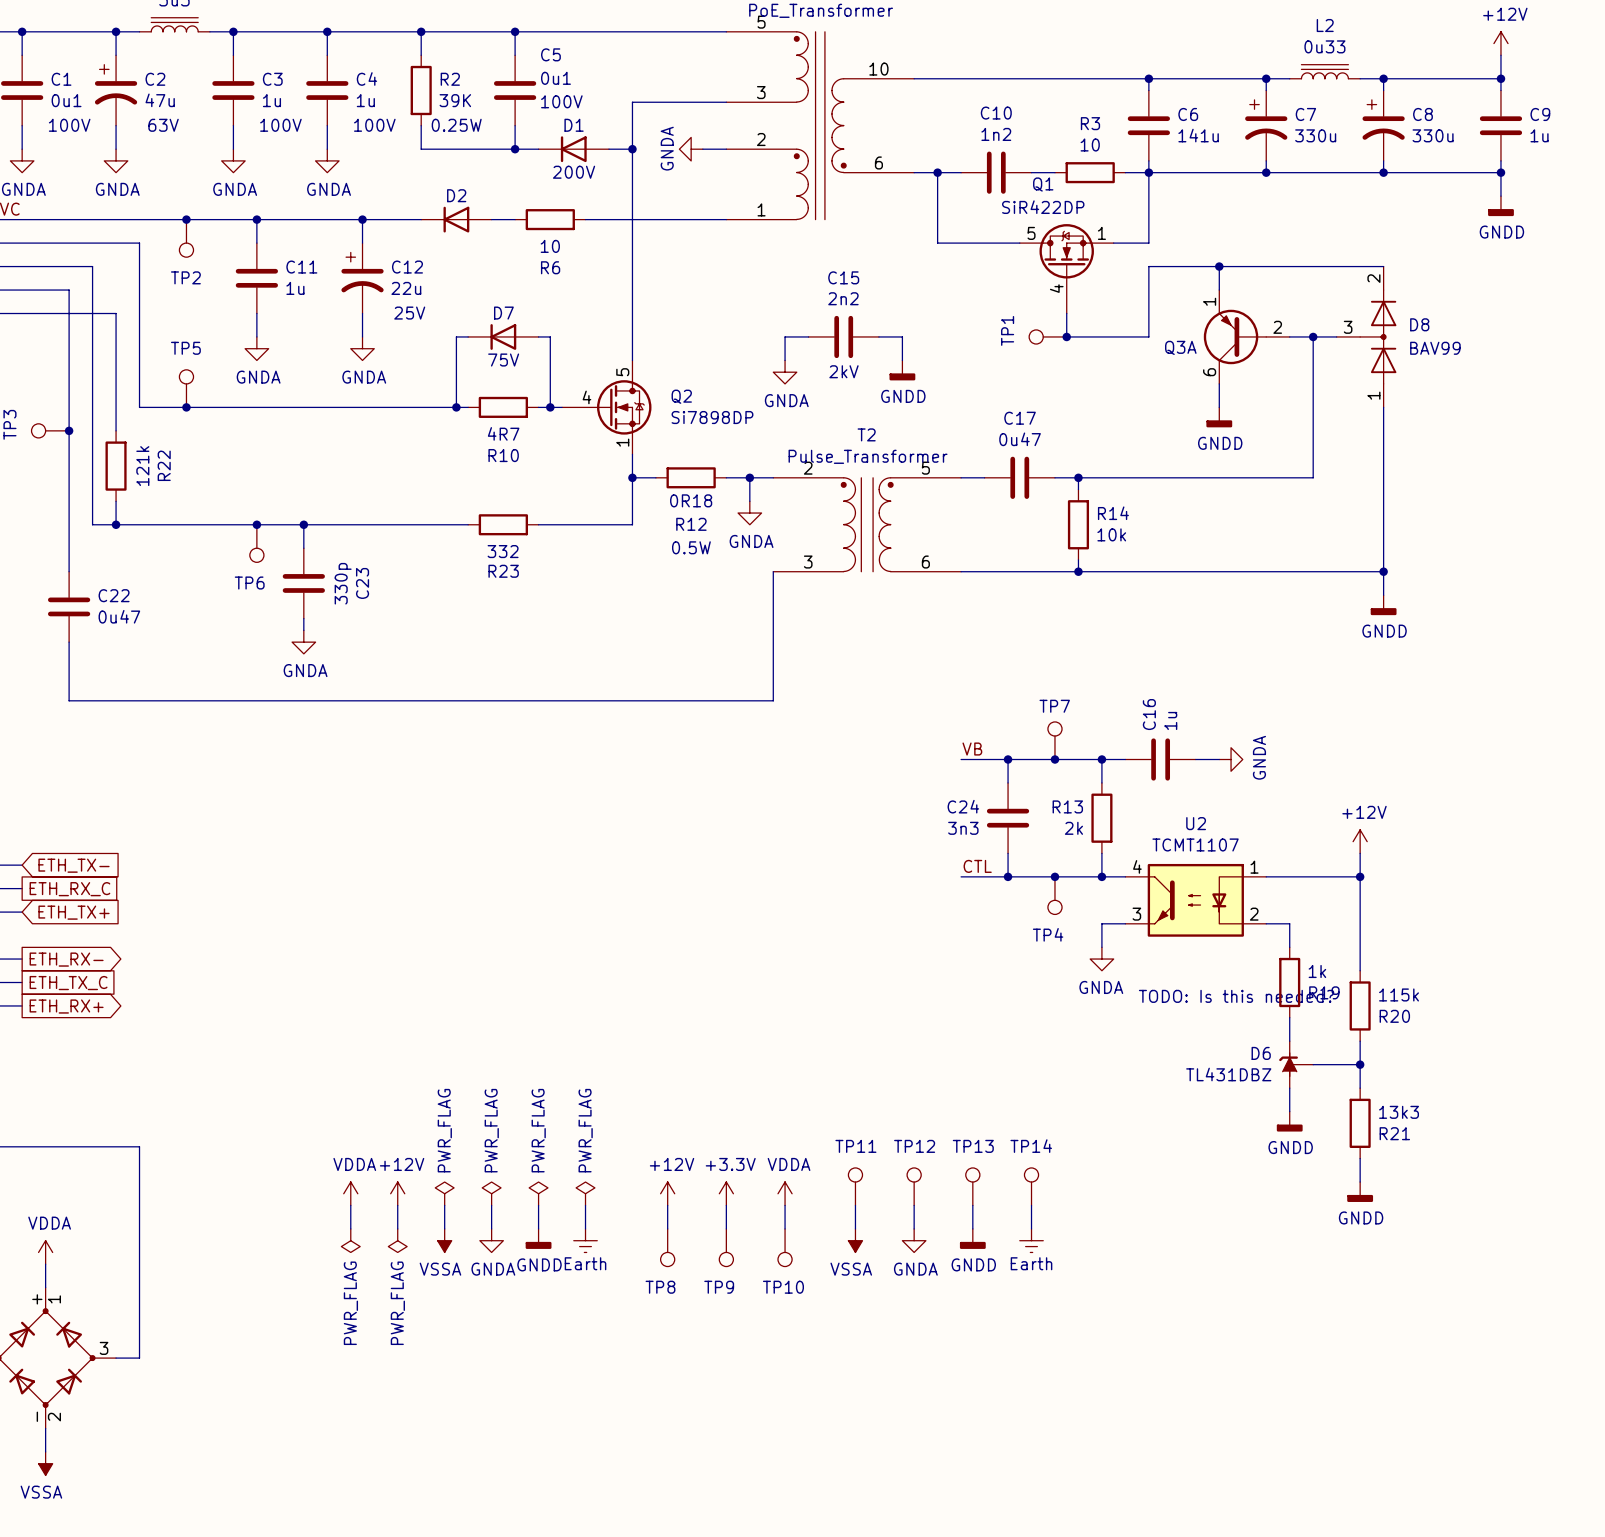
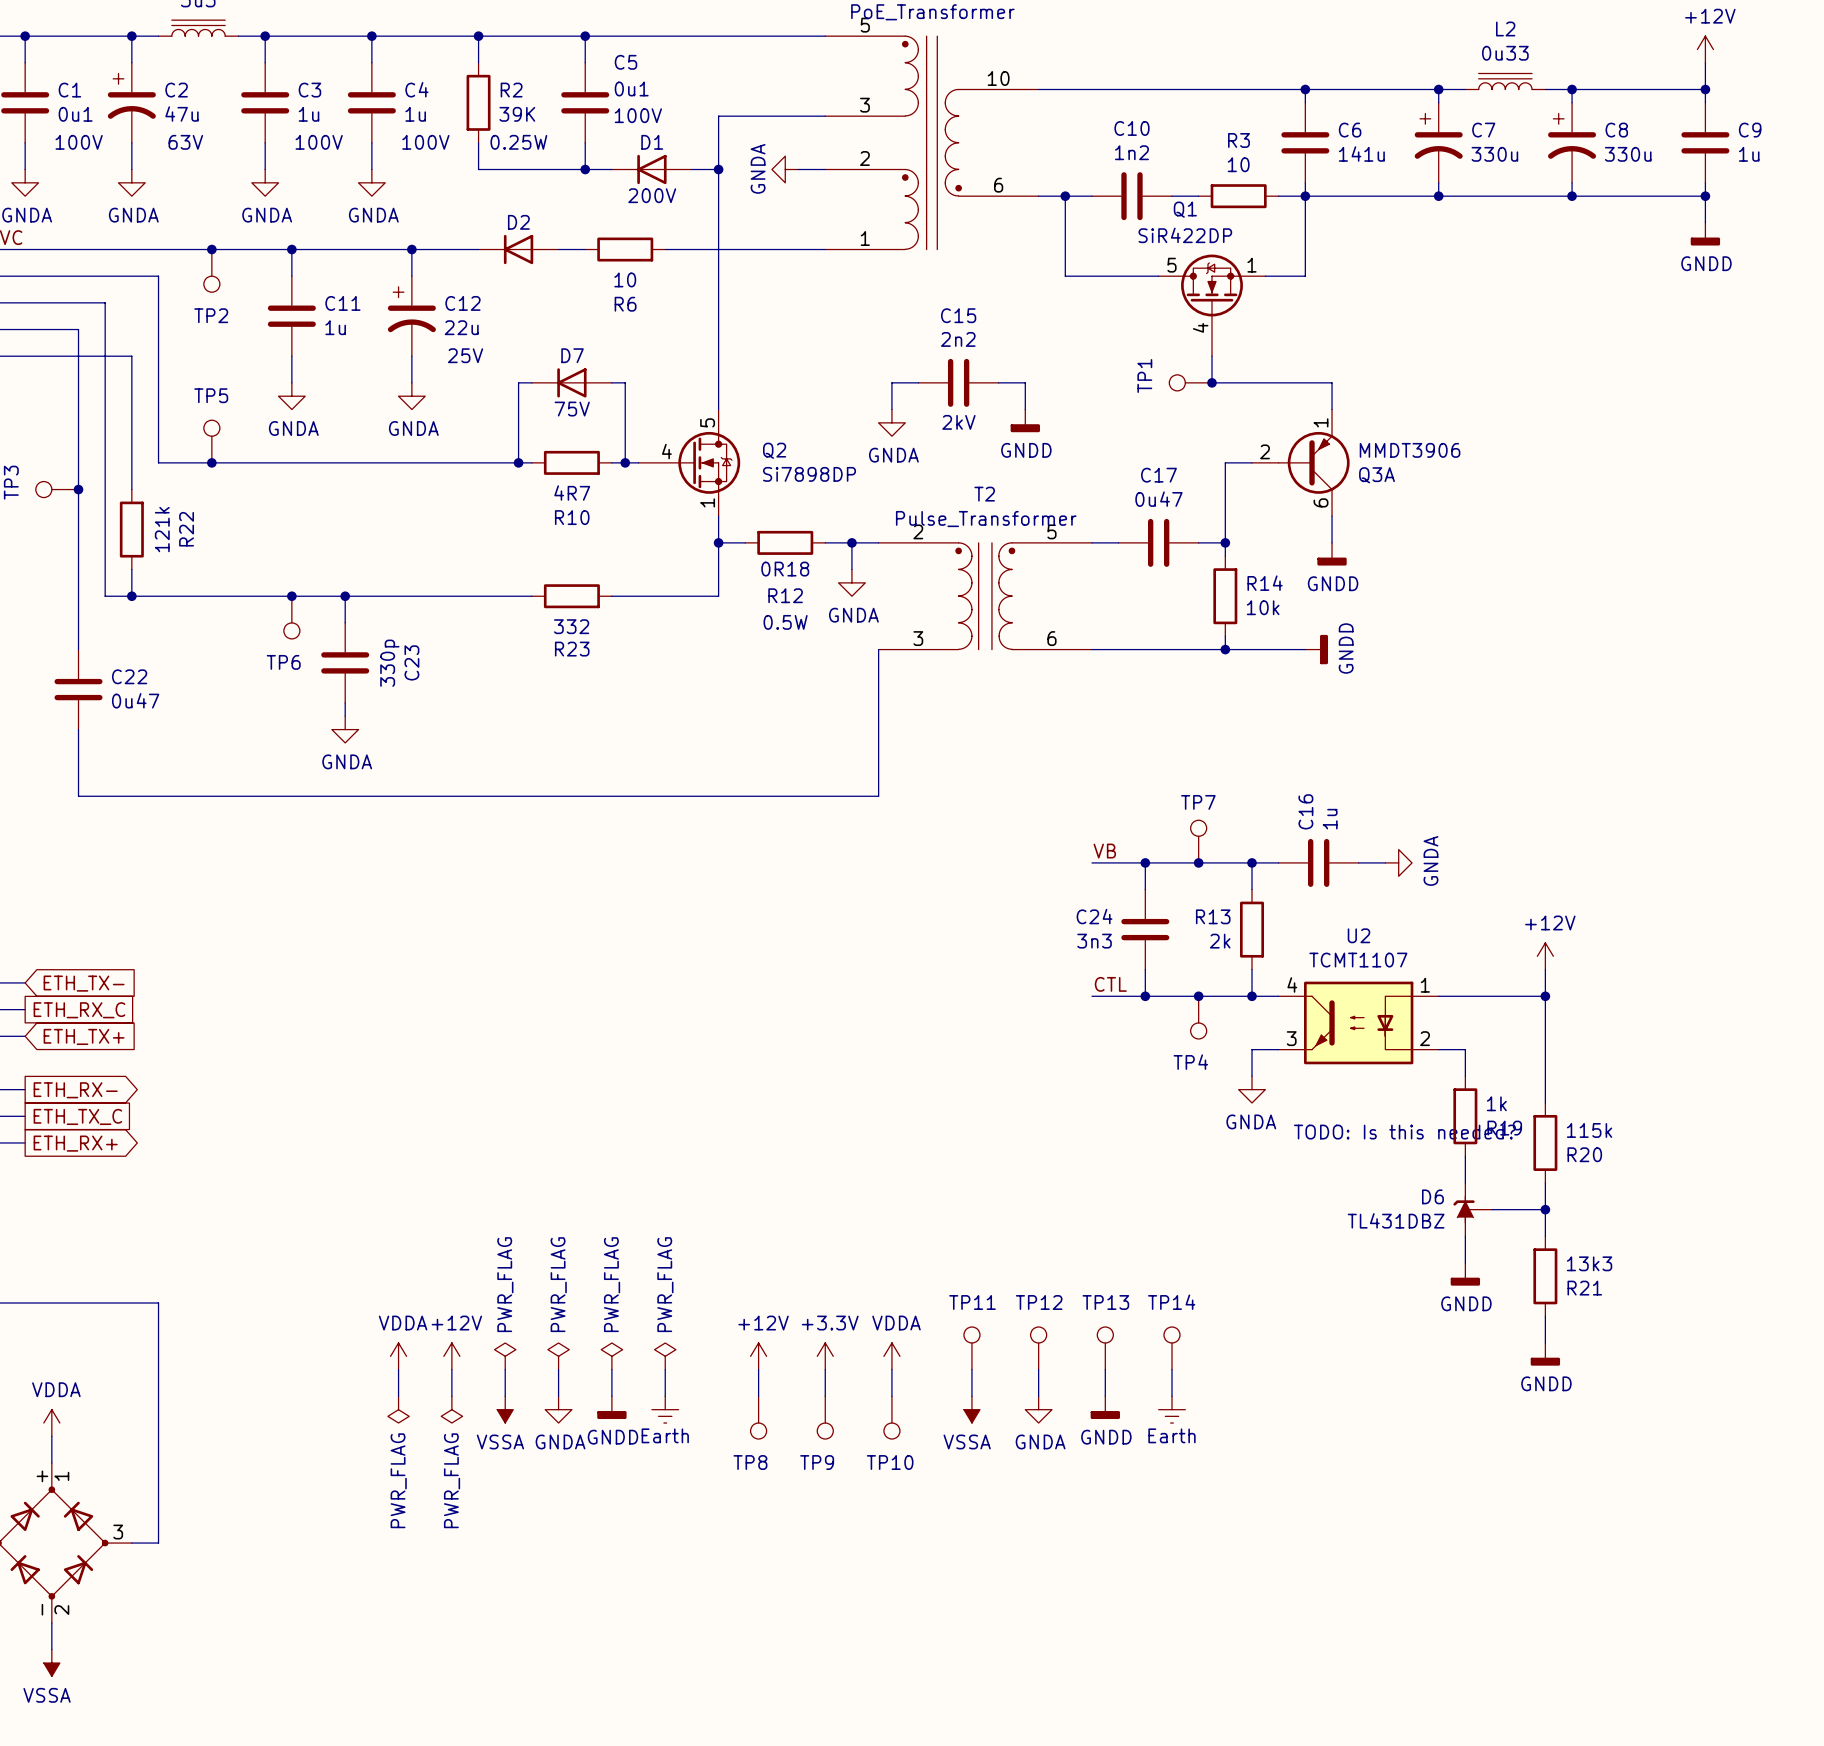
wire: (1219, 266) (1219, 290) -> none
junction: (1219, 266) -> none
wire: (1383, 266) (1148, 266) (1148, 336) -> (1332, 409) (1332, 382) (1305, 382)
Q3A flip: as is (1235, 336) -> left-right (1314, 462)
Q3A position: (1246, 336) -> (1300, 462)
wire: (1289, 336) (1336, 336) -> none
wire: (1313, 336) (1313, 477) (1078, 477) -> (1252, 462) (1225, 462) (1225, 542)
junction: (1313, 336) -> none
D8: BAV99 (1366, 336) -> none
wire: (1219, 383) (1219, 407) -> (1332, 516) (1332, 542)
Q3A value: none -> MMDT3906 (1410, 450)
wire: (1383, 407) (1383, 595) -> none
power symbol: GNDD (1219, 417) -> none
power symbol: none -> GNDD (1332, 554)
wire: (1148, 571) (1383, 571) -> none
power symbol: none -> GNDD (1316, 649)
junction: (1383, 571) -> none
power symbol: GNDD (1383, 605) -> none

